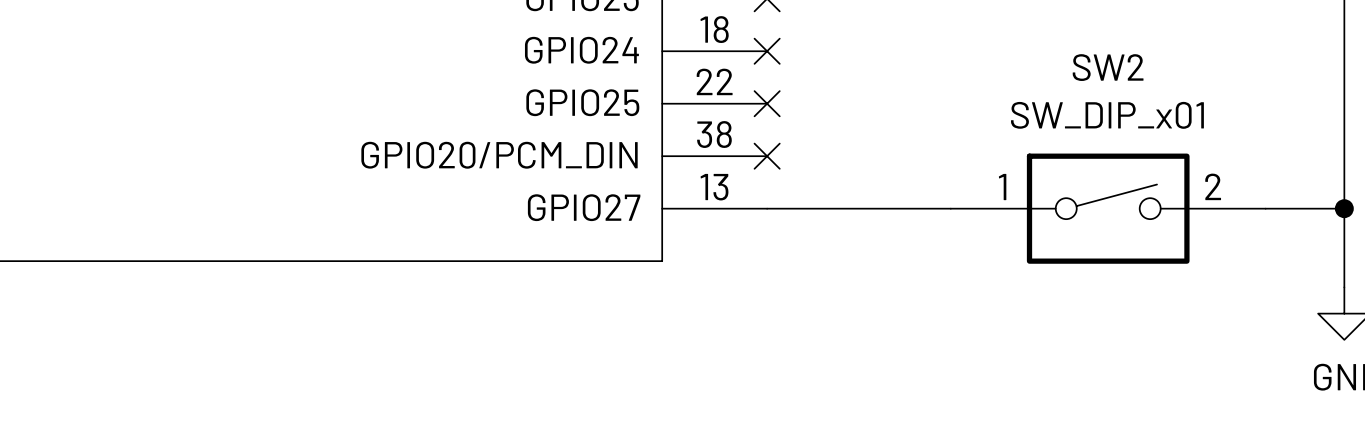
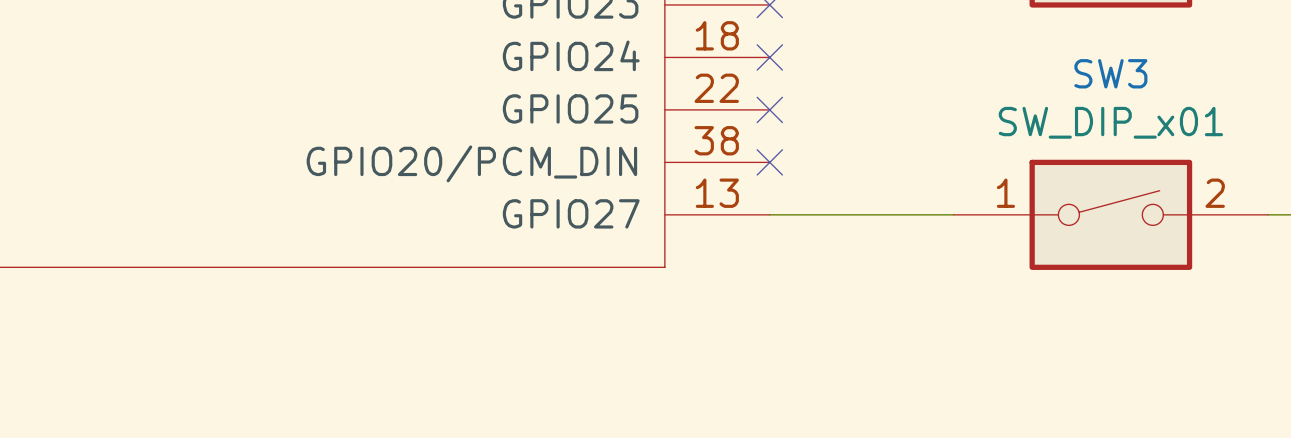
SW2 name: SW2 (1108, 67) -> SW3 (1110, 73)

